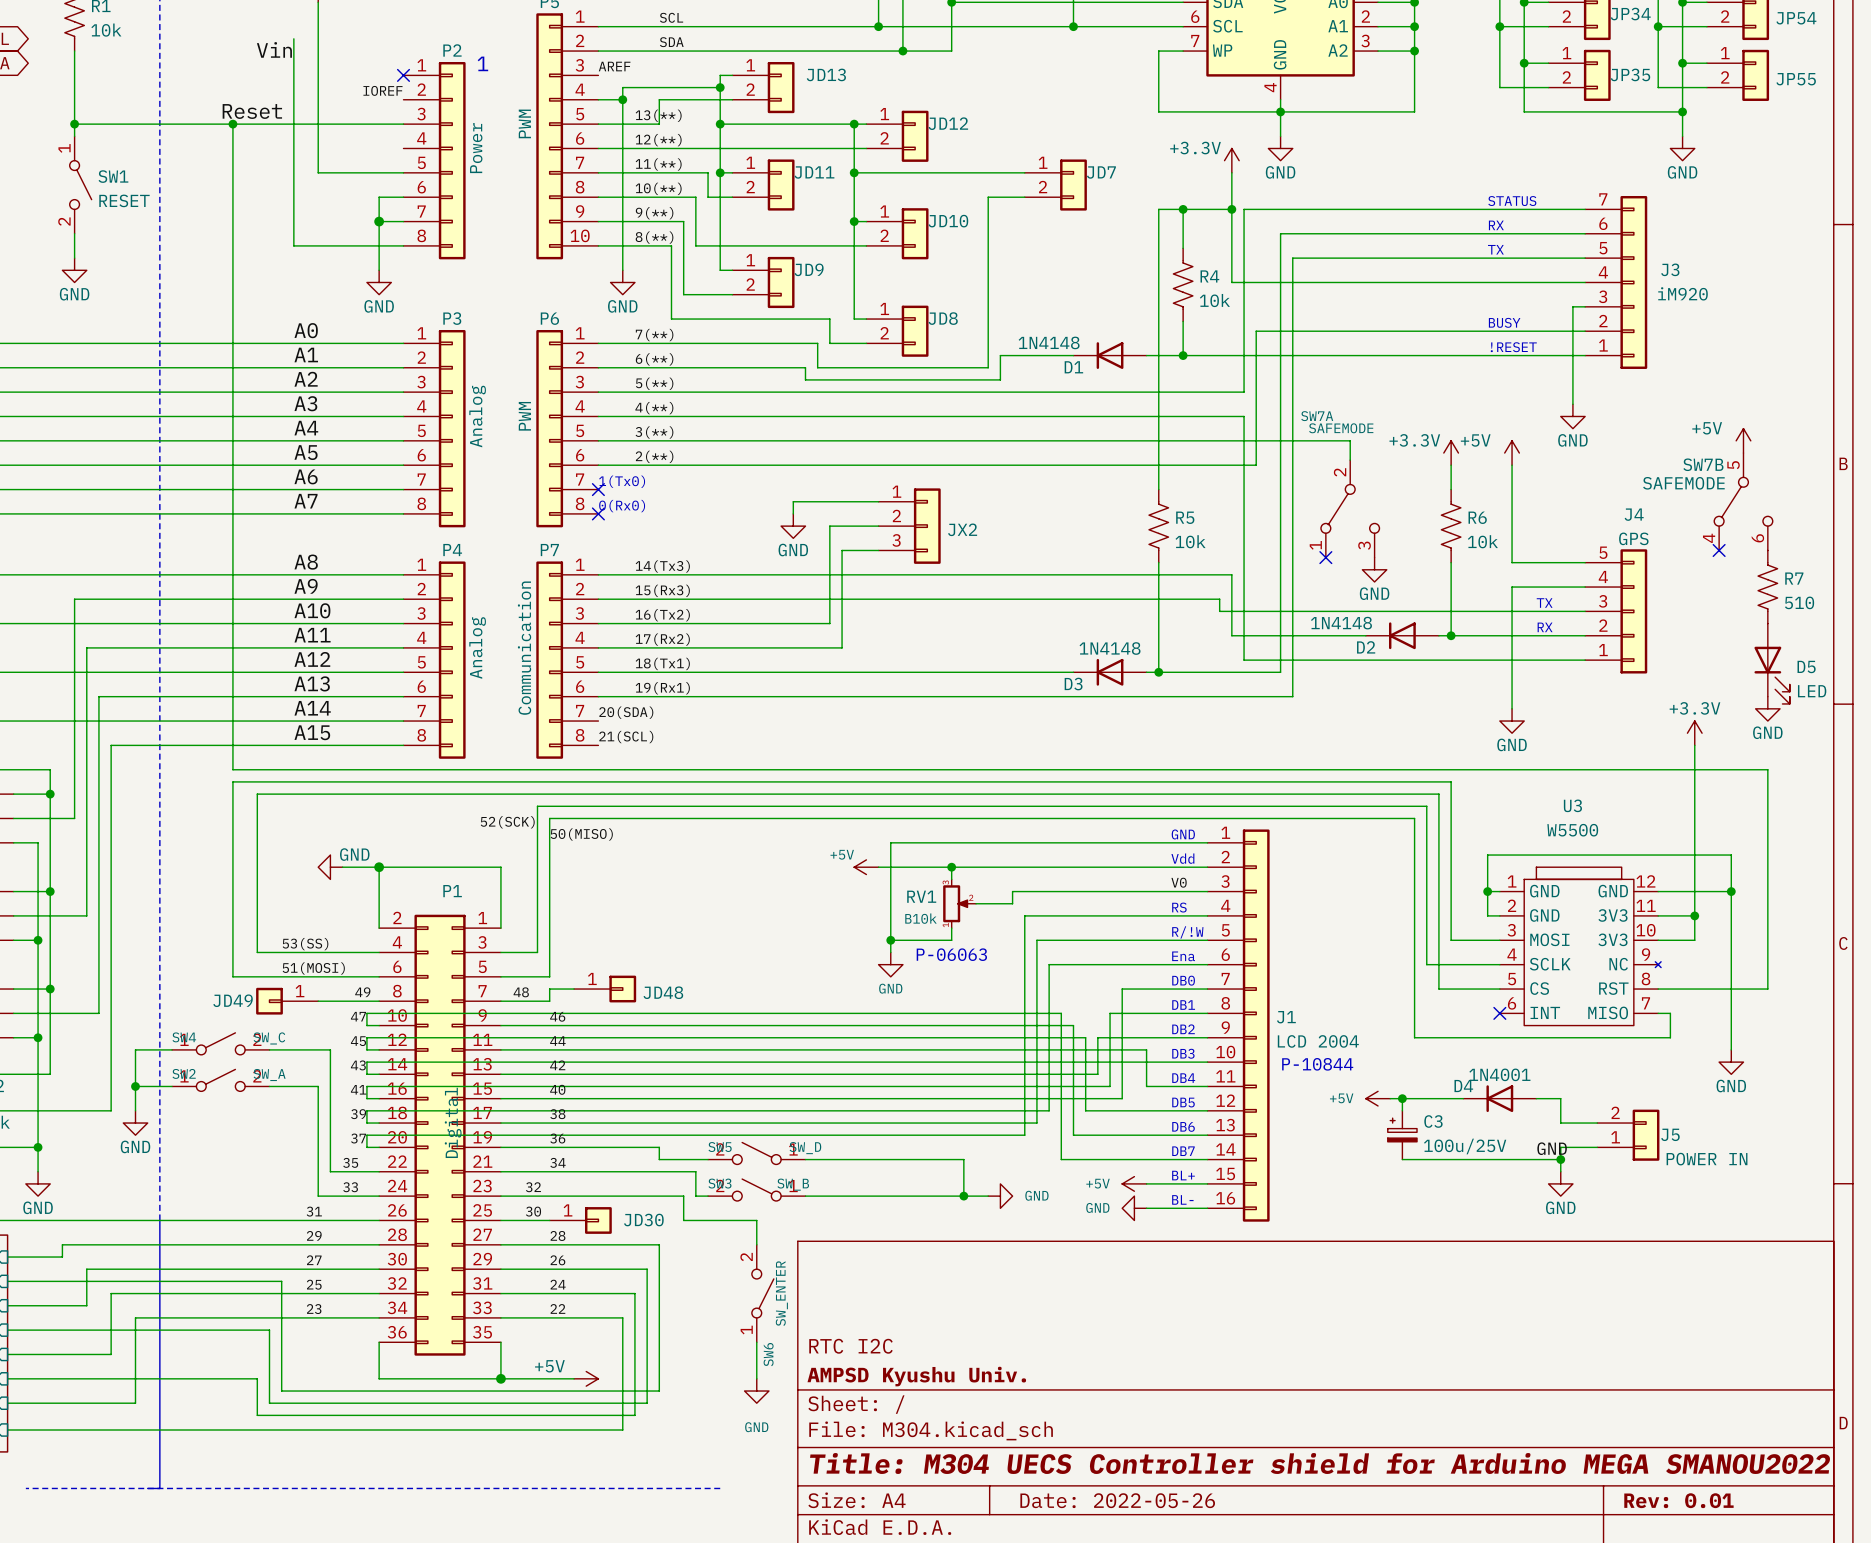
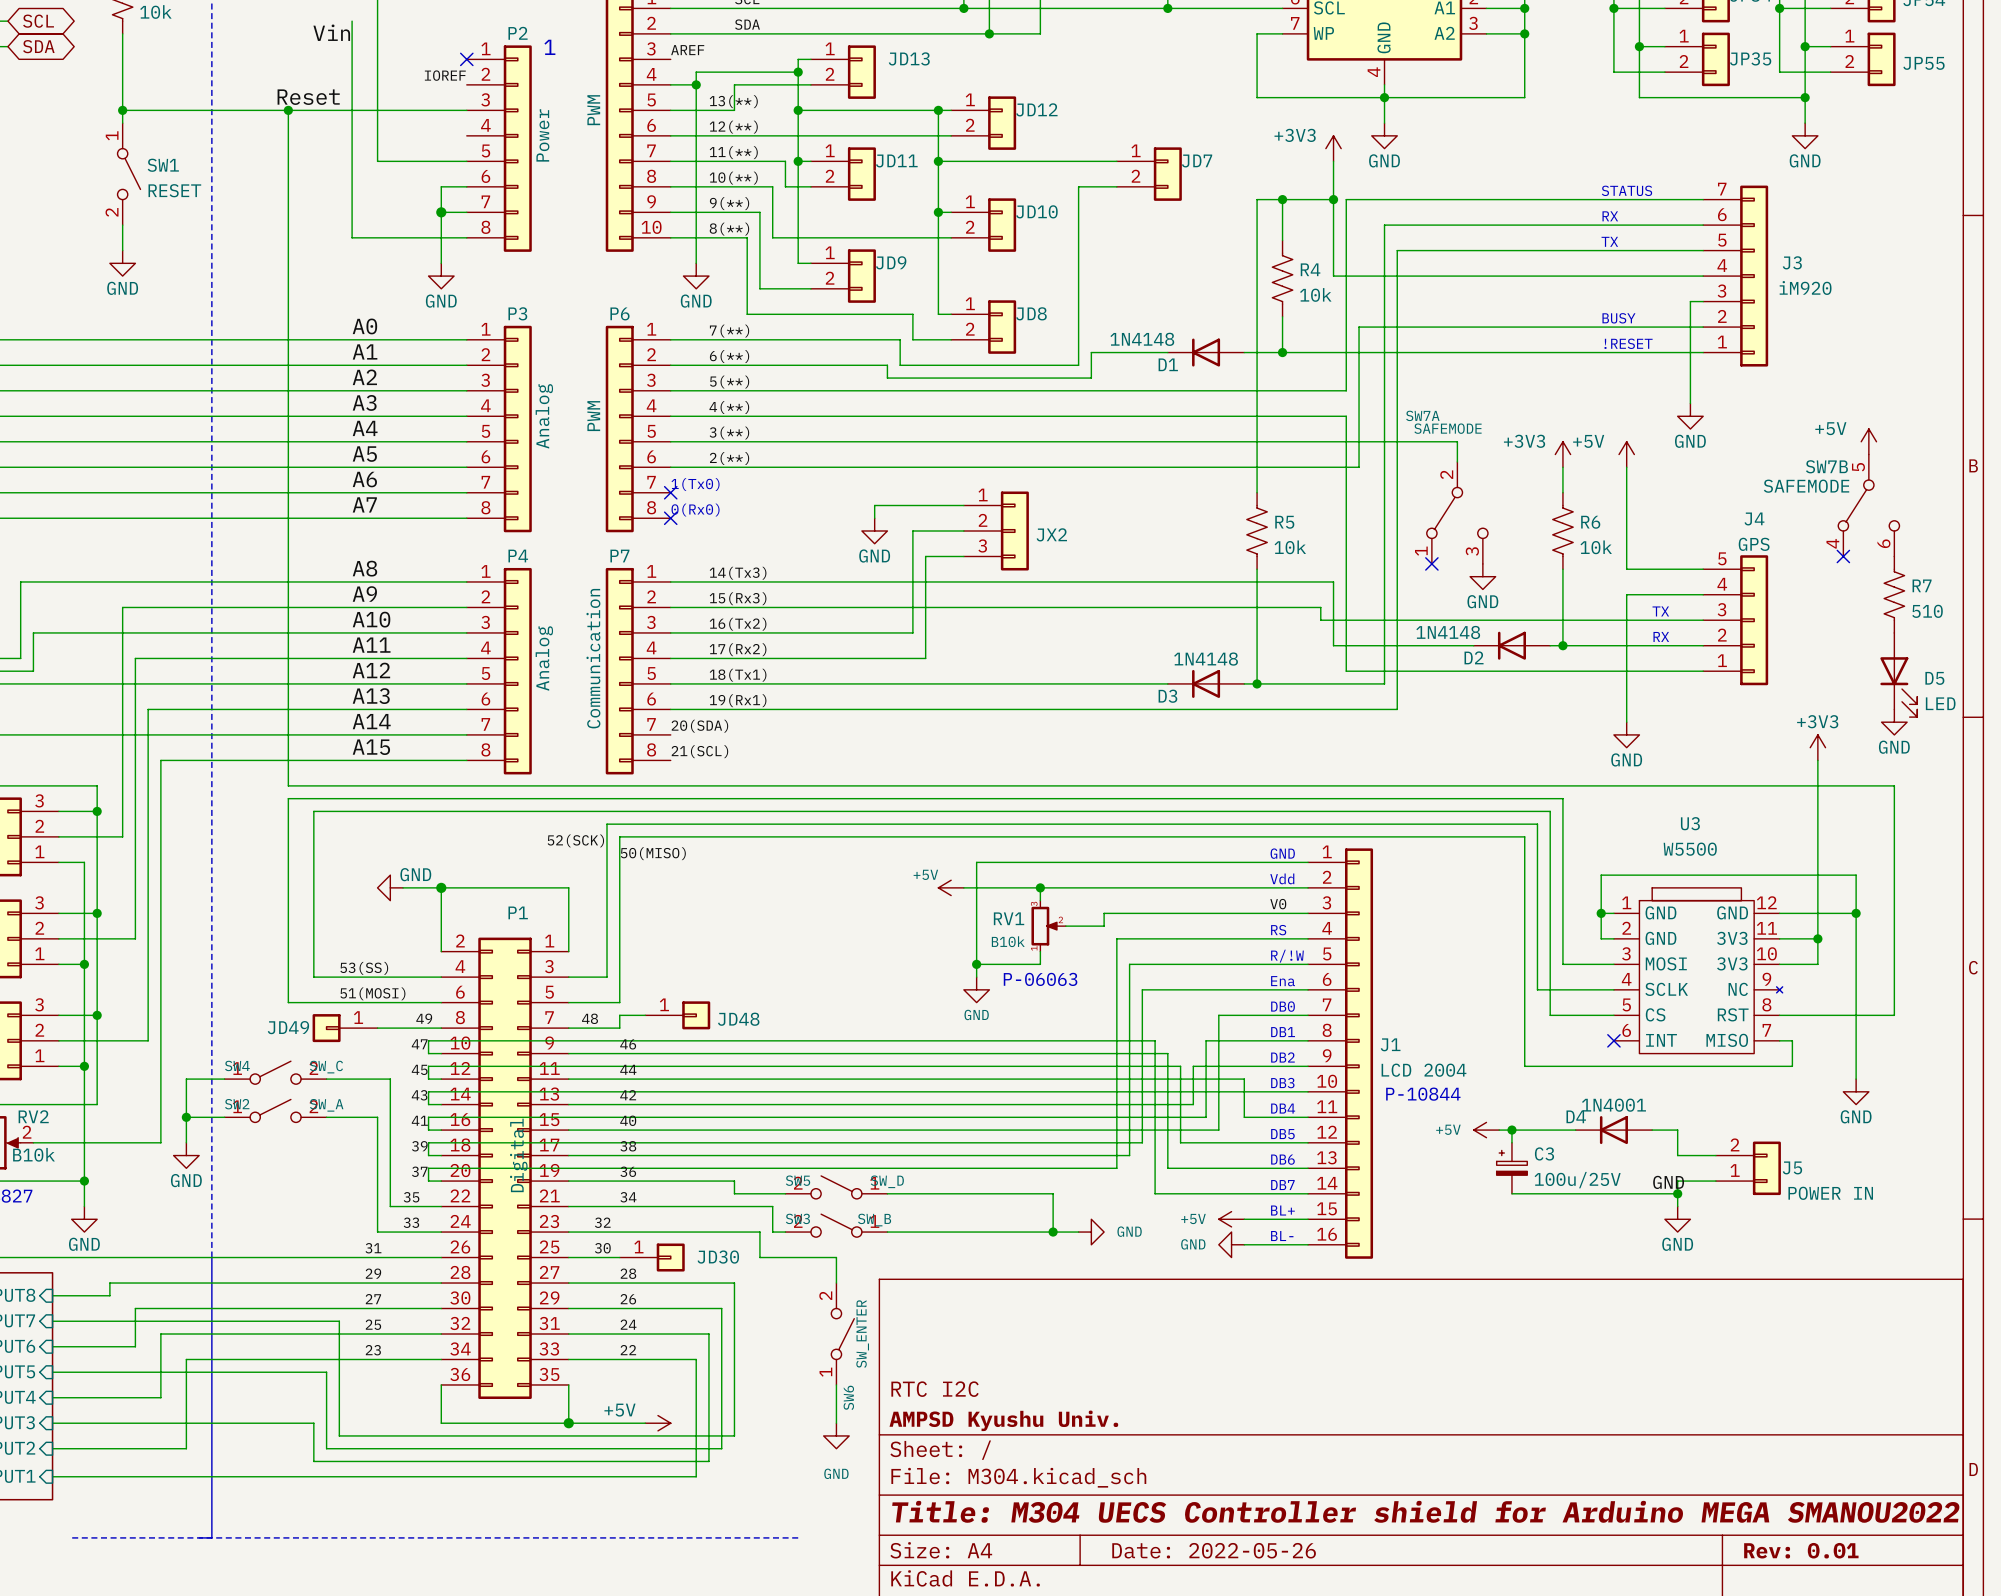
power symbol: +3.3V (1231, 160) -> +3V3 (1333, 148)
power symbol: +3.3V (1451, 453) -> +3V3 (1562, 454)
power symbol: +3.3V (1694, 733) -> +3V3 (1817, 747)

